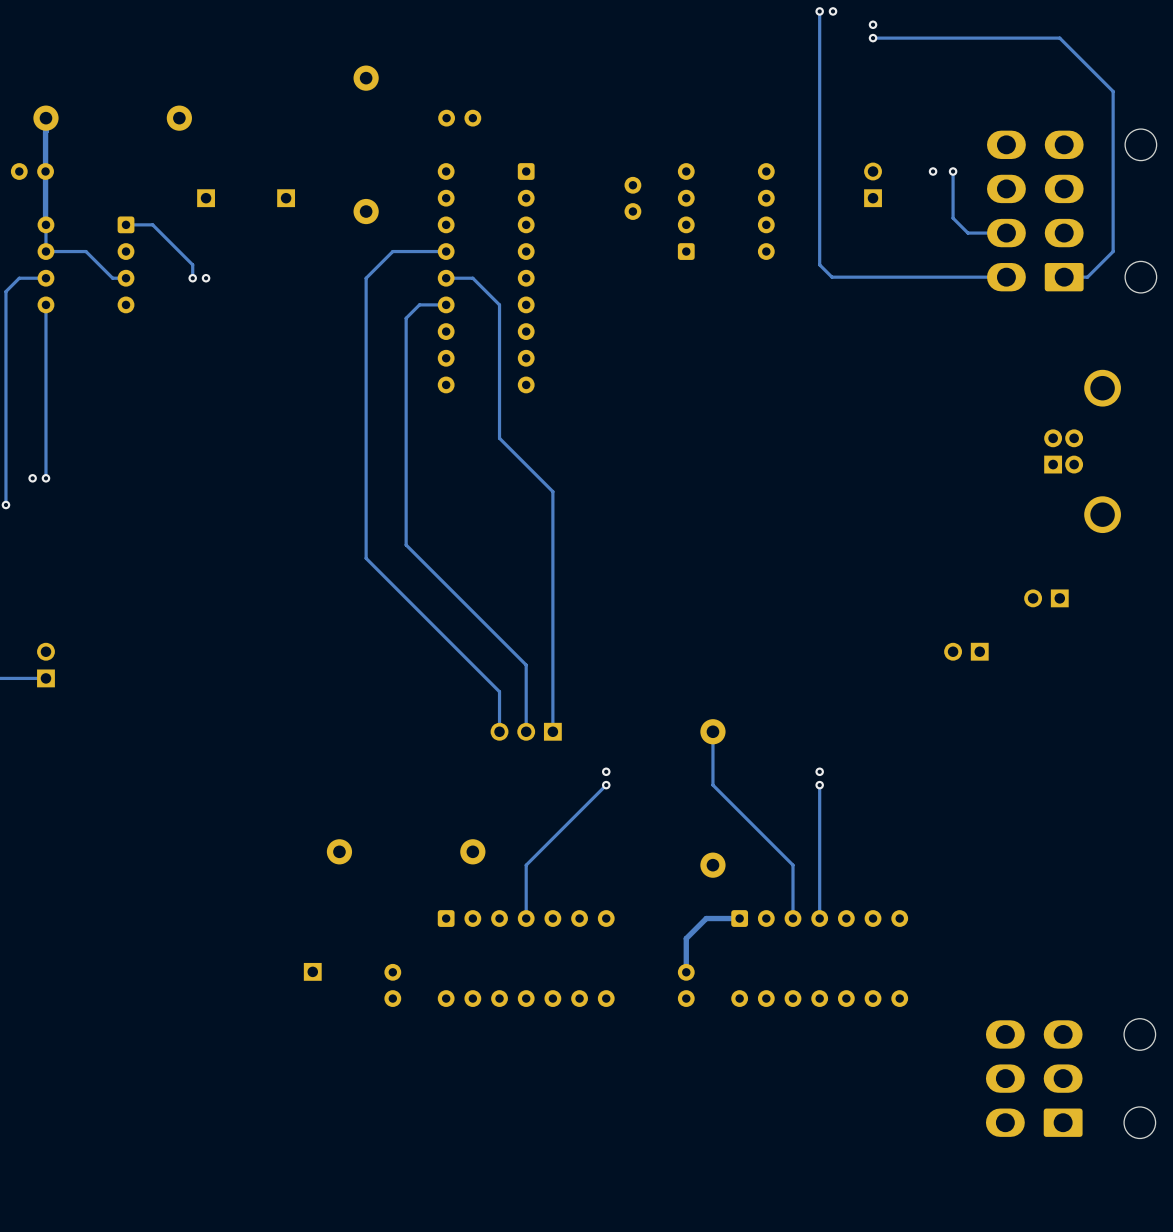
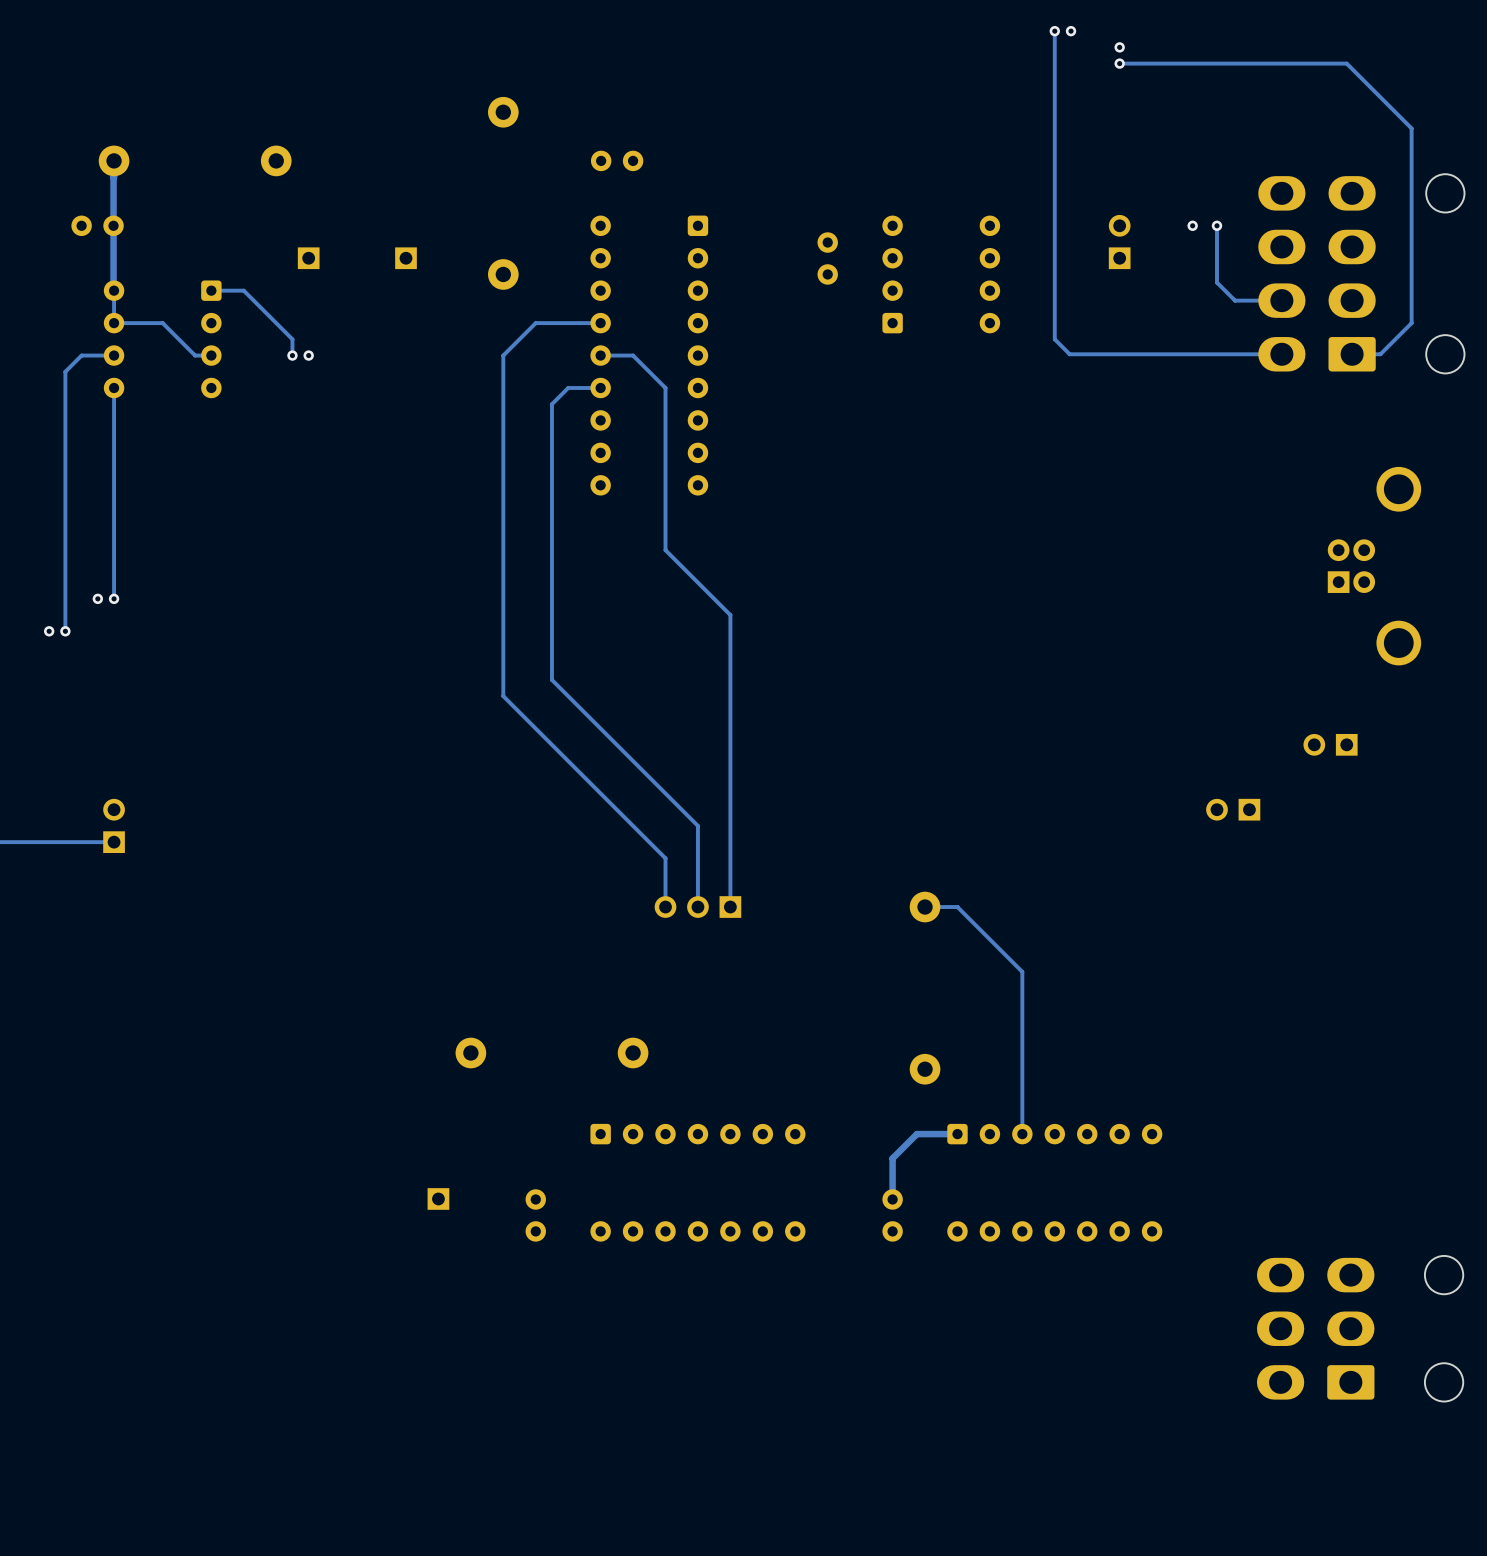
track: (712, 731) (712, 785) (793, 865) -> (925, 907) (957, 907) (1022, 971) (1022, 1069)
via: (606, 771) -> none
via: (819, 771) -> none
track: (606, 785) (526, 865) (526, 918) -> none
via: (606, 785) -> none
track: (819, 785) (819, 918) -> none
via: (819, 785) -> none

